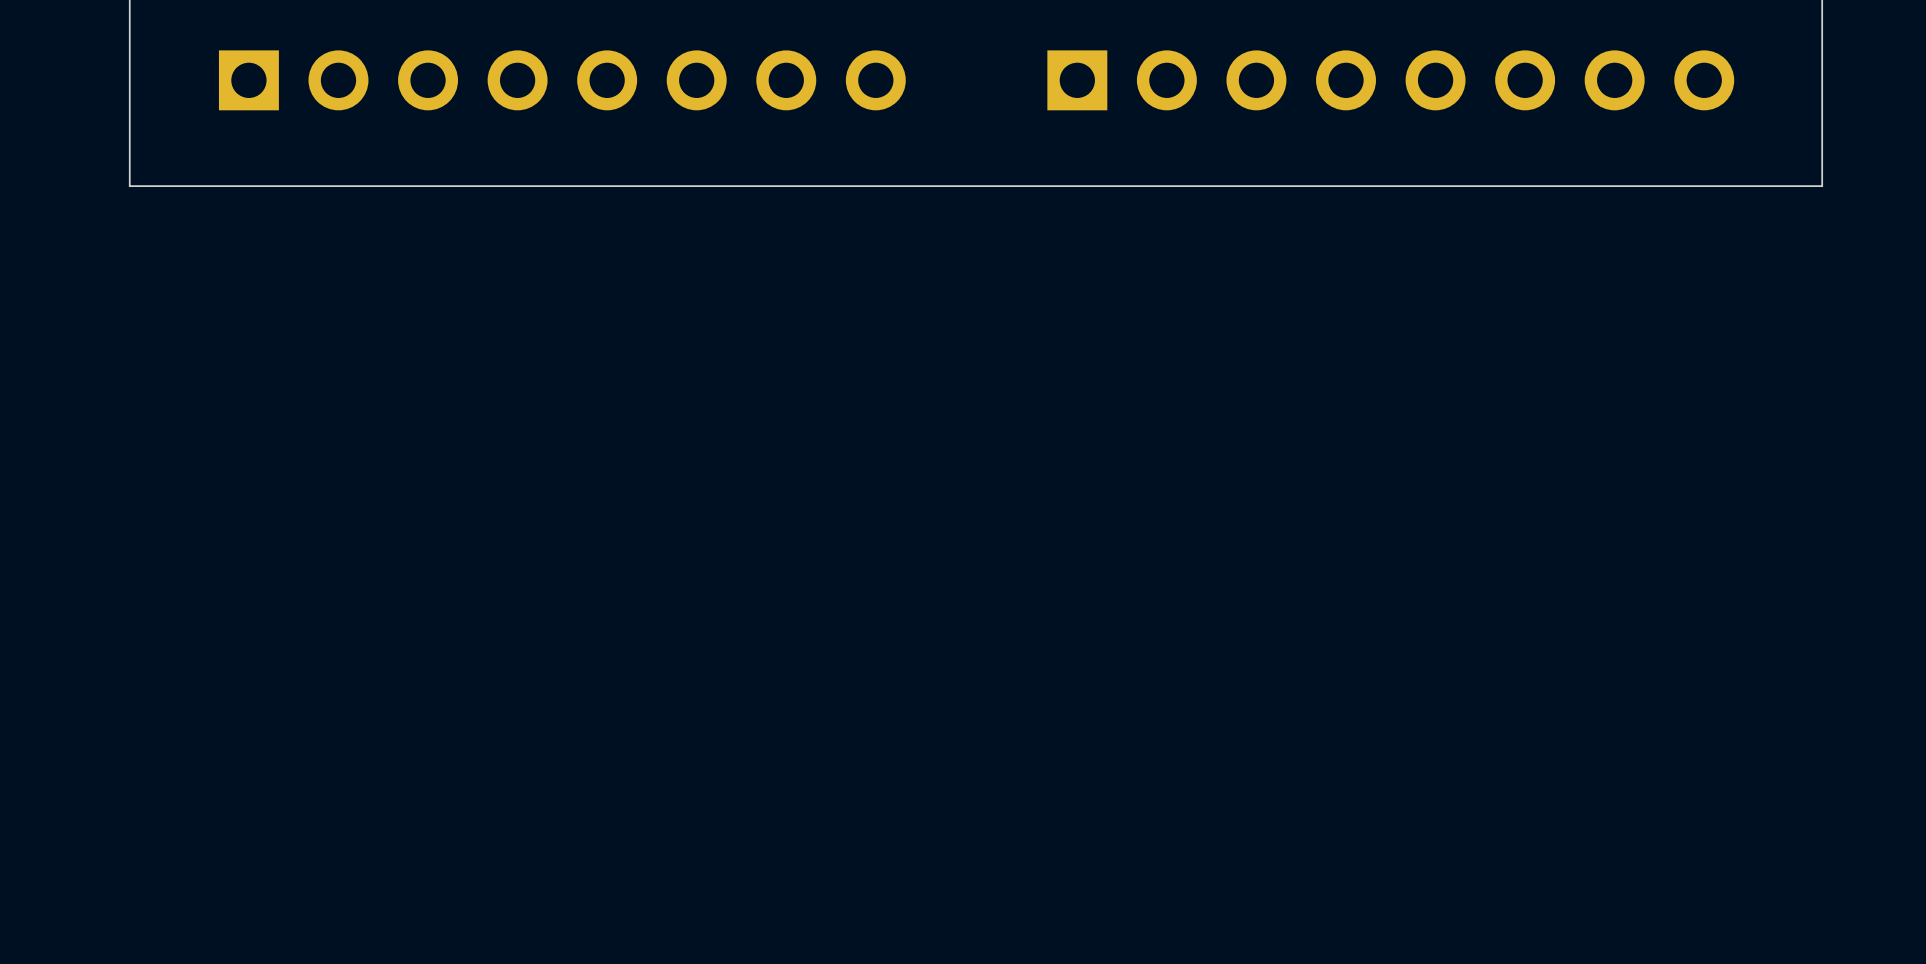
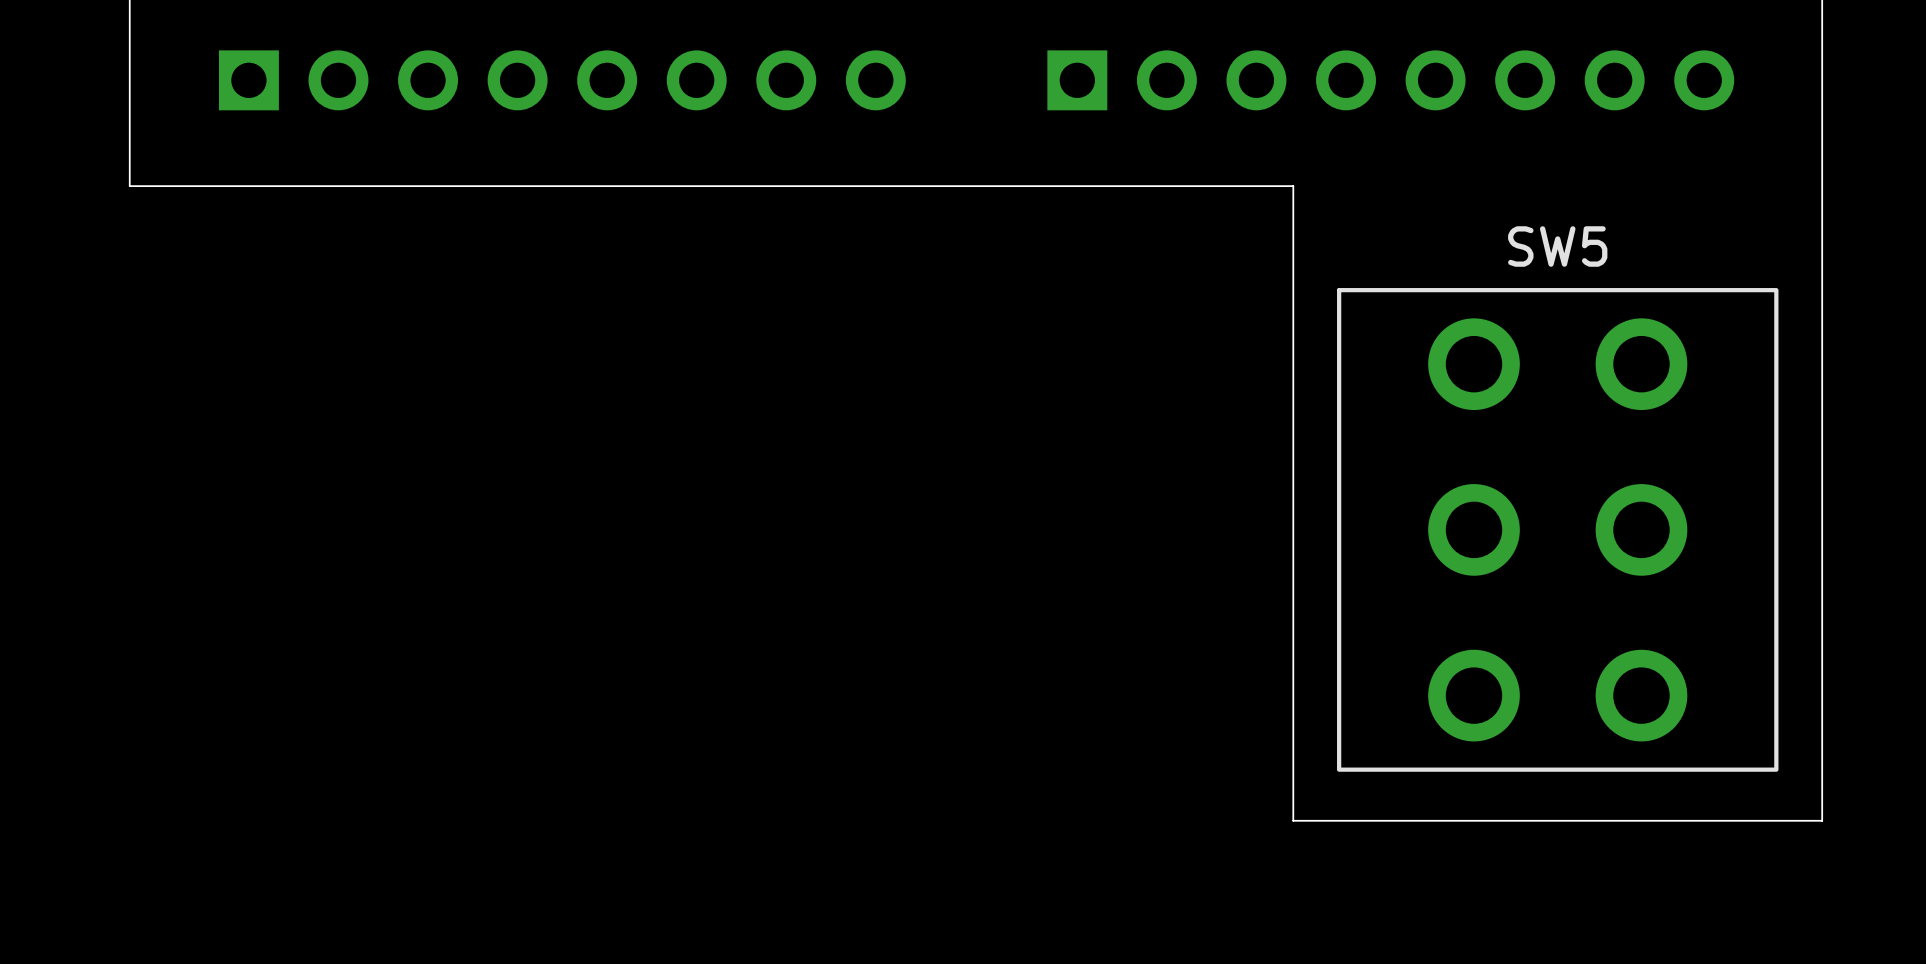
board edge: (1293, 186) (1822, 186) -> (1293, 186) (1293, 820) (1822, 820) (1822, 186)
SW5: none -> (1557, 529)

